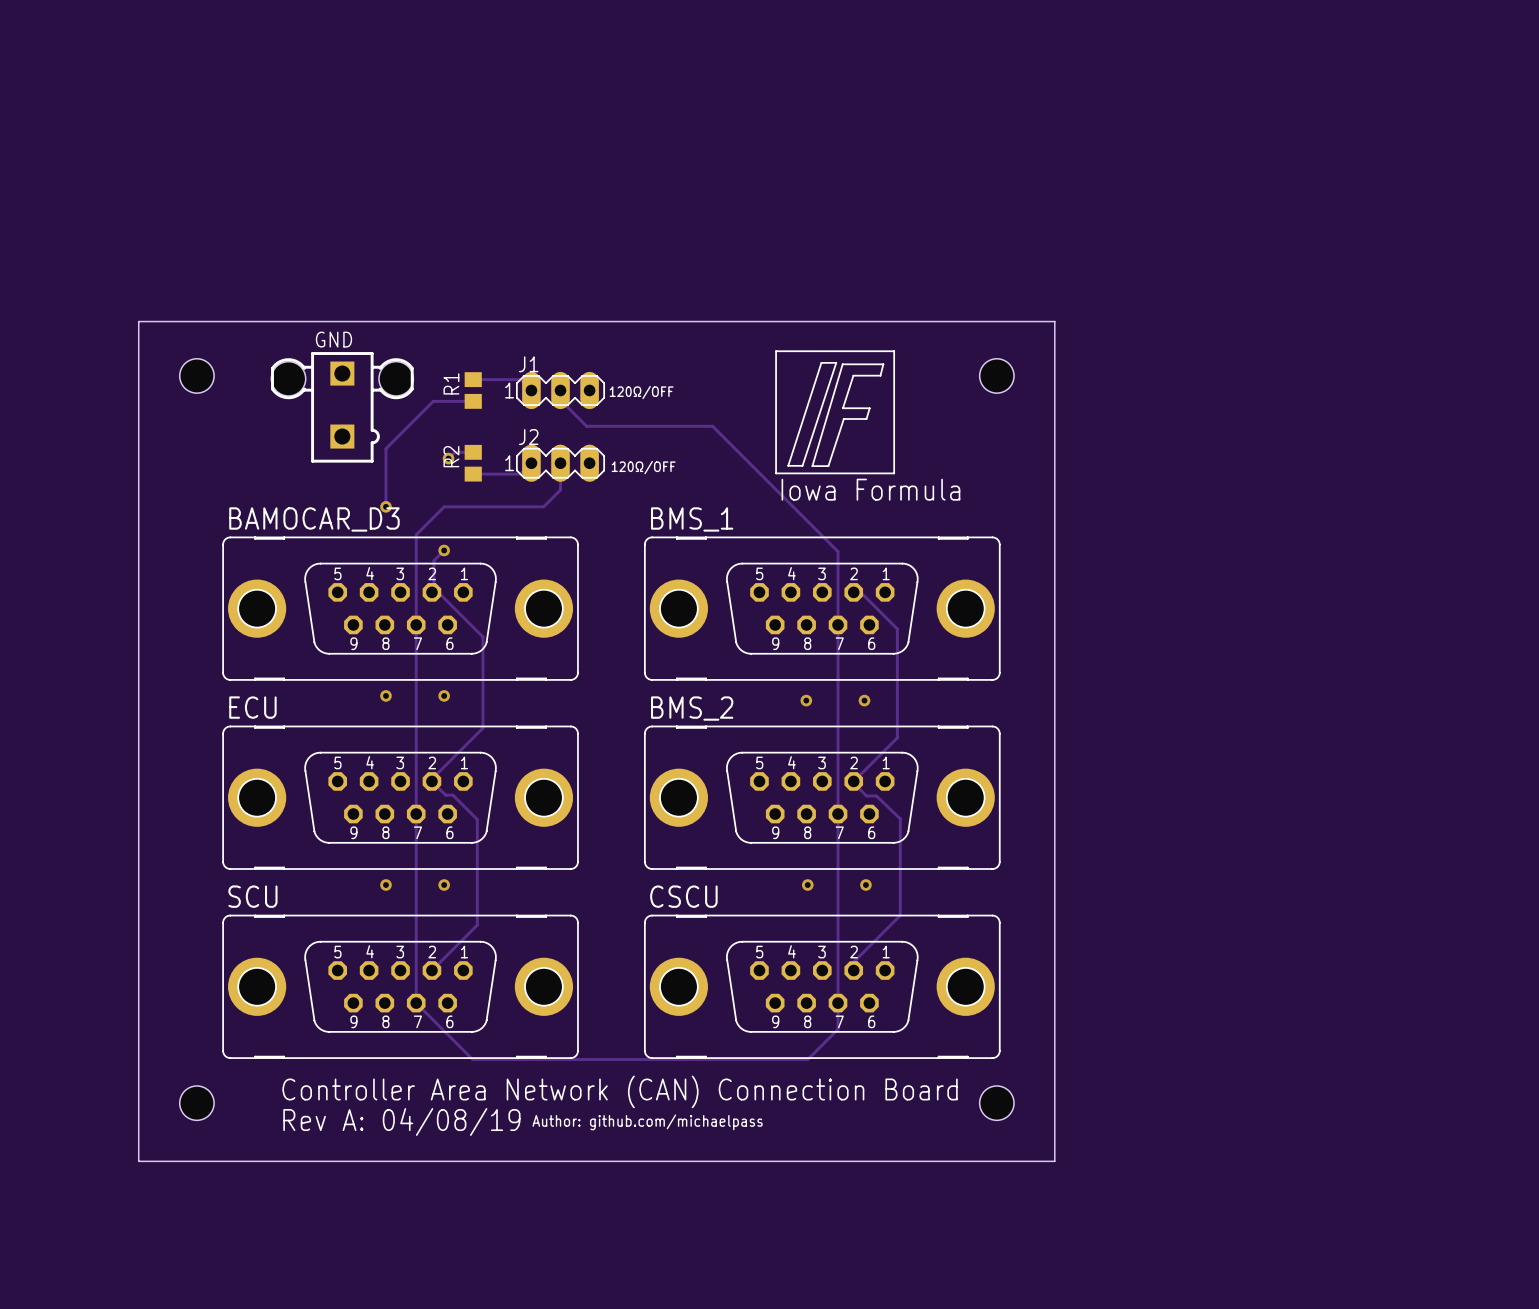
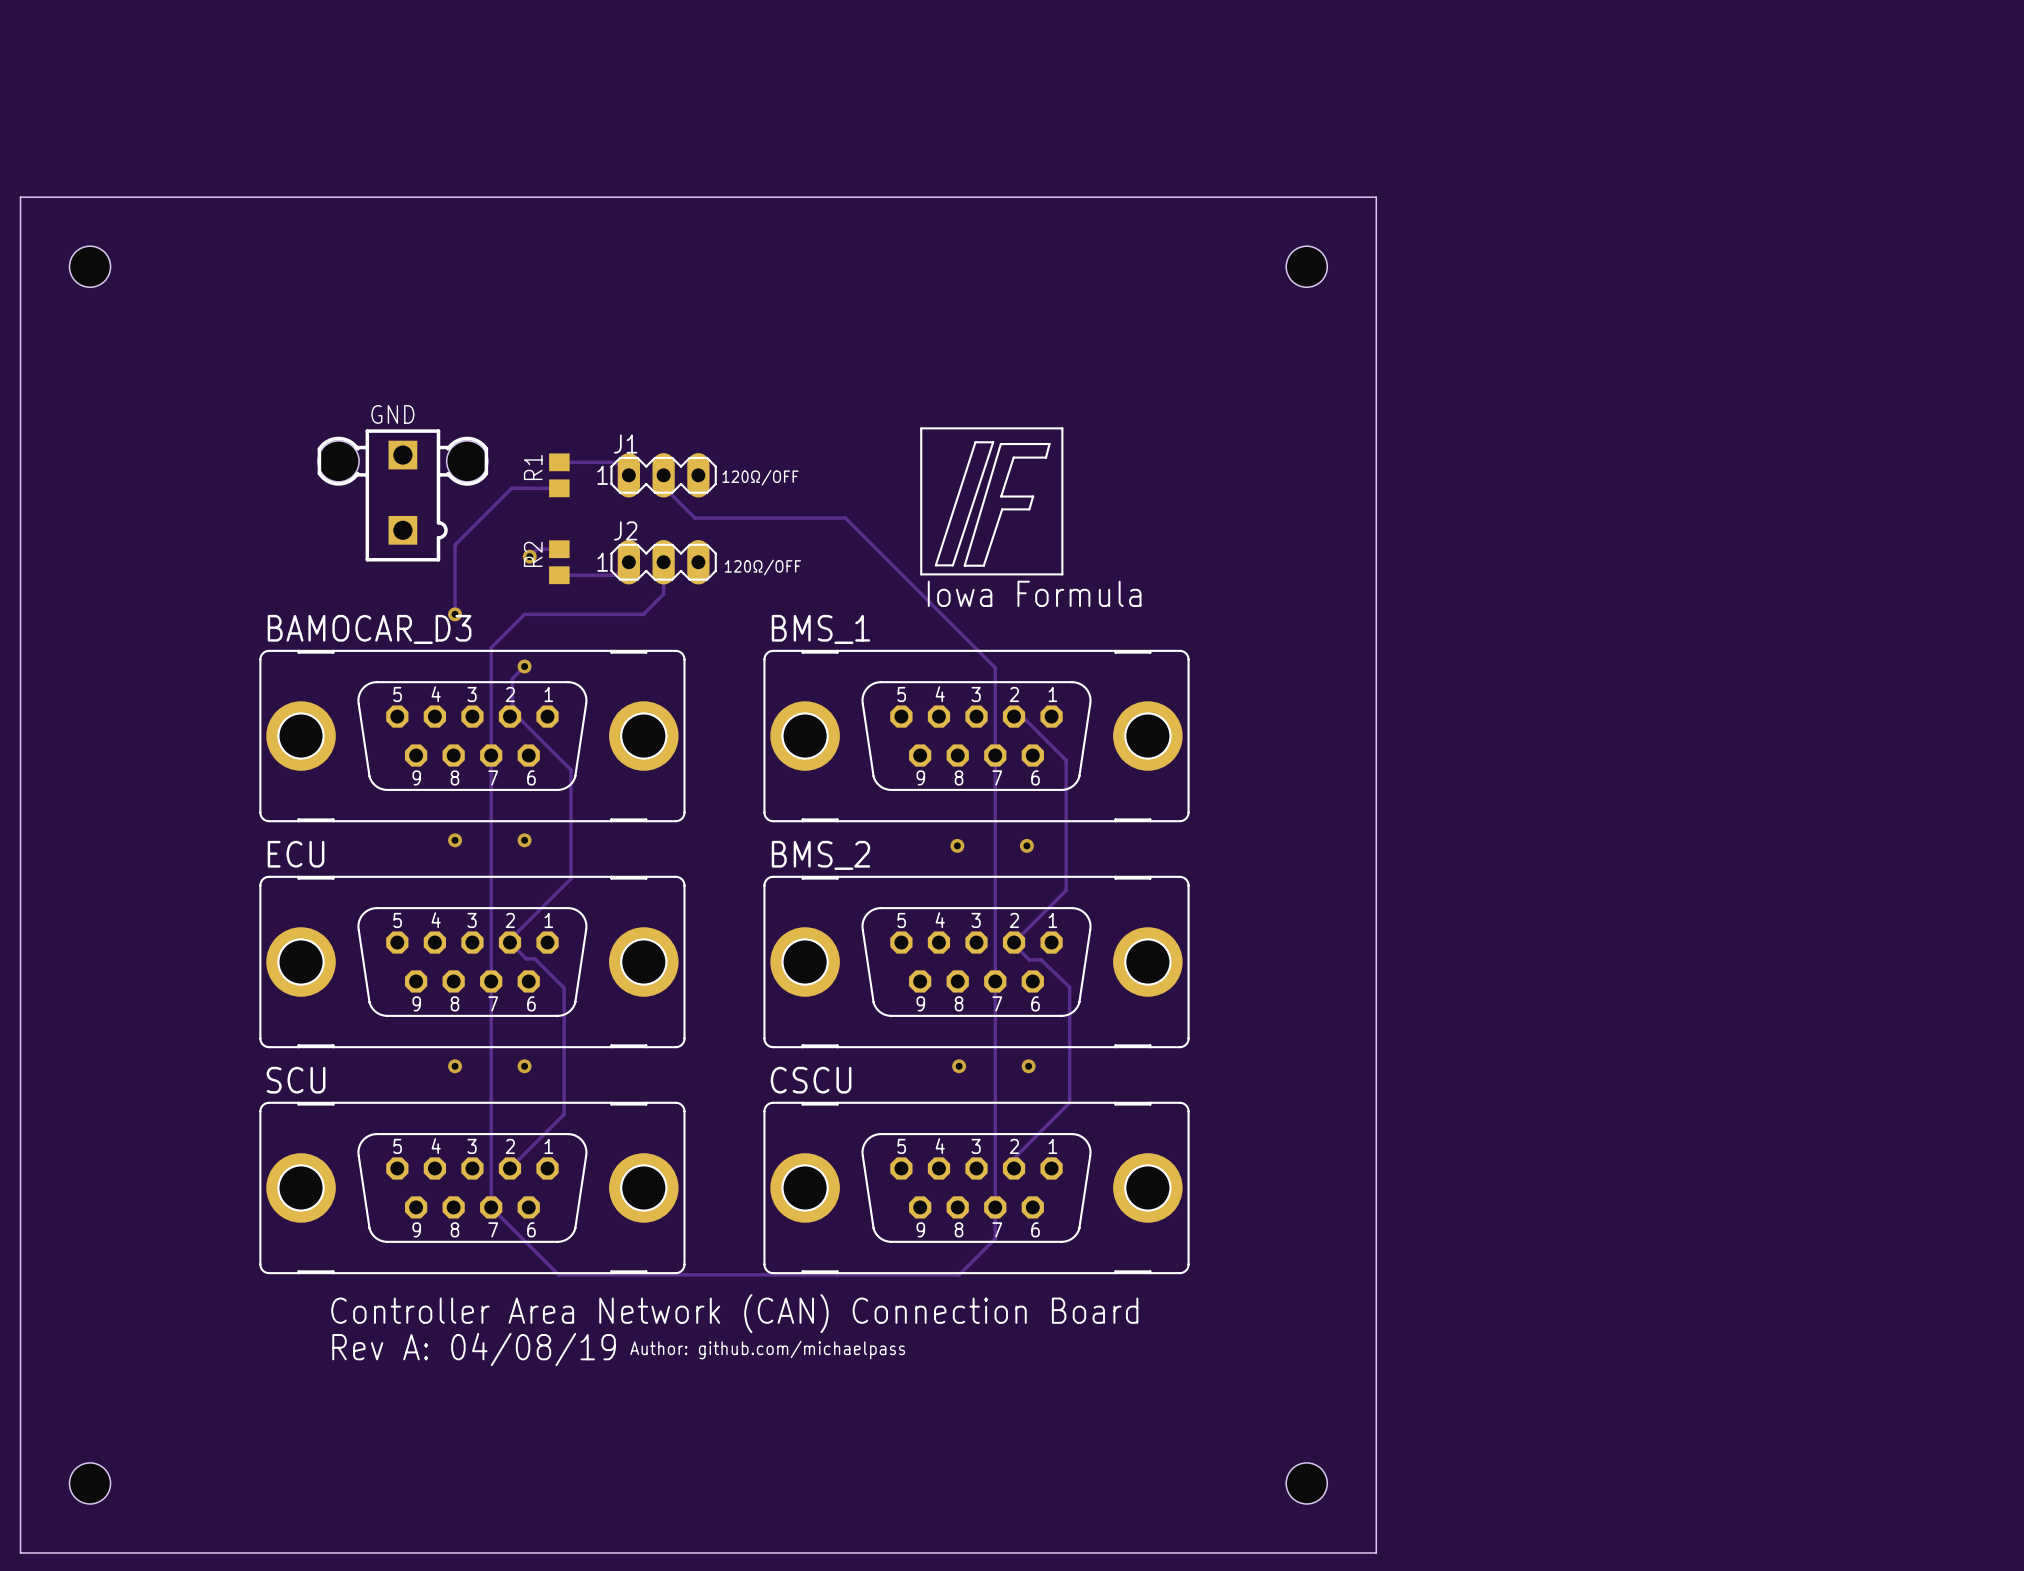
board edge: (138, 321) (1054, 321) (1054, 1161) (138, 1161) (138, 321) -> (20, 197) (20, 1552) (1376, 1552) (1376, 197) (20, 197)
hole position: (196, 375) -> (90, 266)
hole position: (996, 375) -> (1306, 266)
hole position: (196, 1103) -> (90, 1483)
hole position: (996, 1103) -> (1306, 1483)

